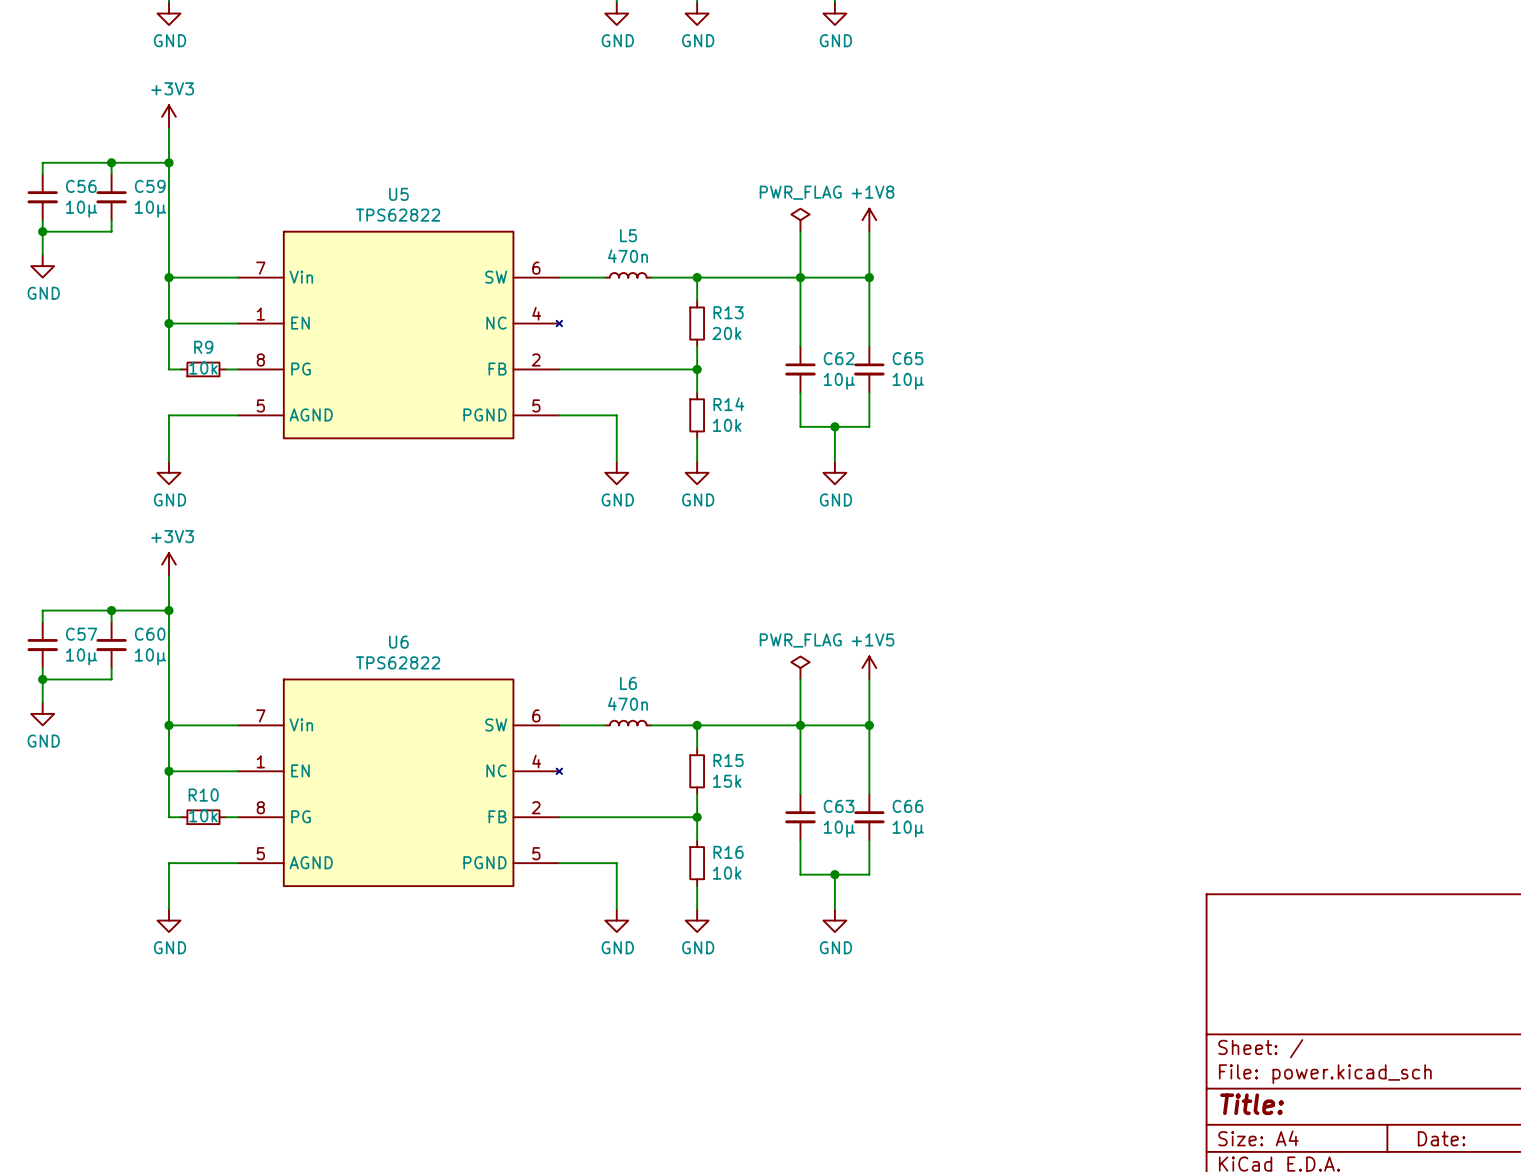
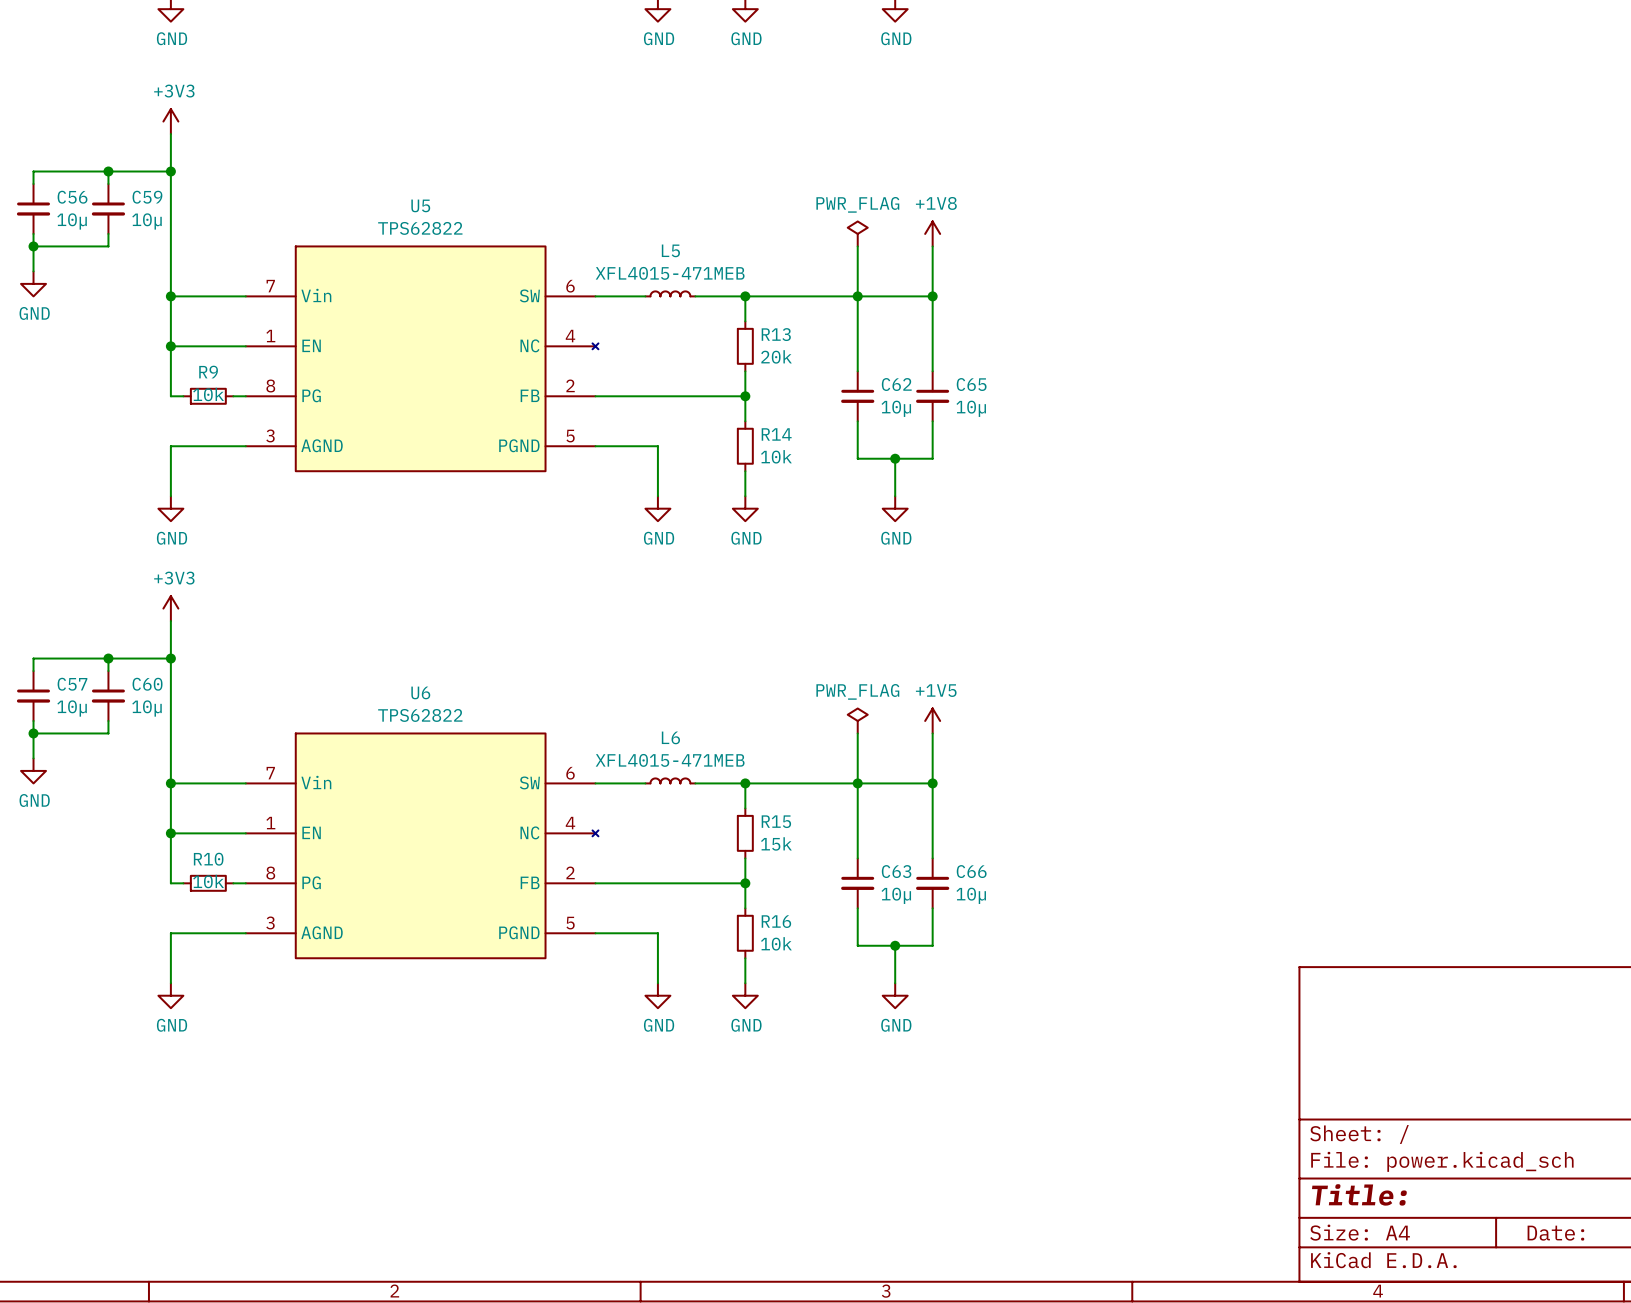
L5 value: 470n (627, 256) -> XFL4015-471MEB (670, 273)
U5 pin number: 5 (260, 405) -> 3 (270, 435)
L6 value: 470n (627, 703) -> XFL4015-471MEB (670, 760)
U6 pin number: 5 (260, 853) -> 3 (270, 922)

